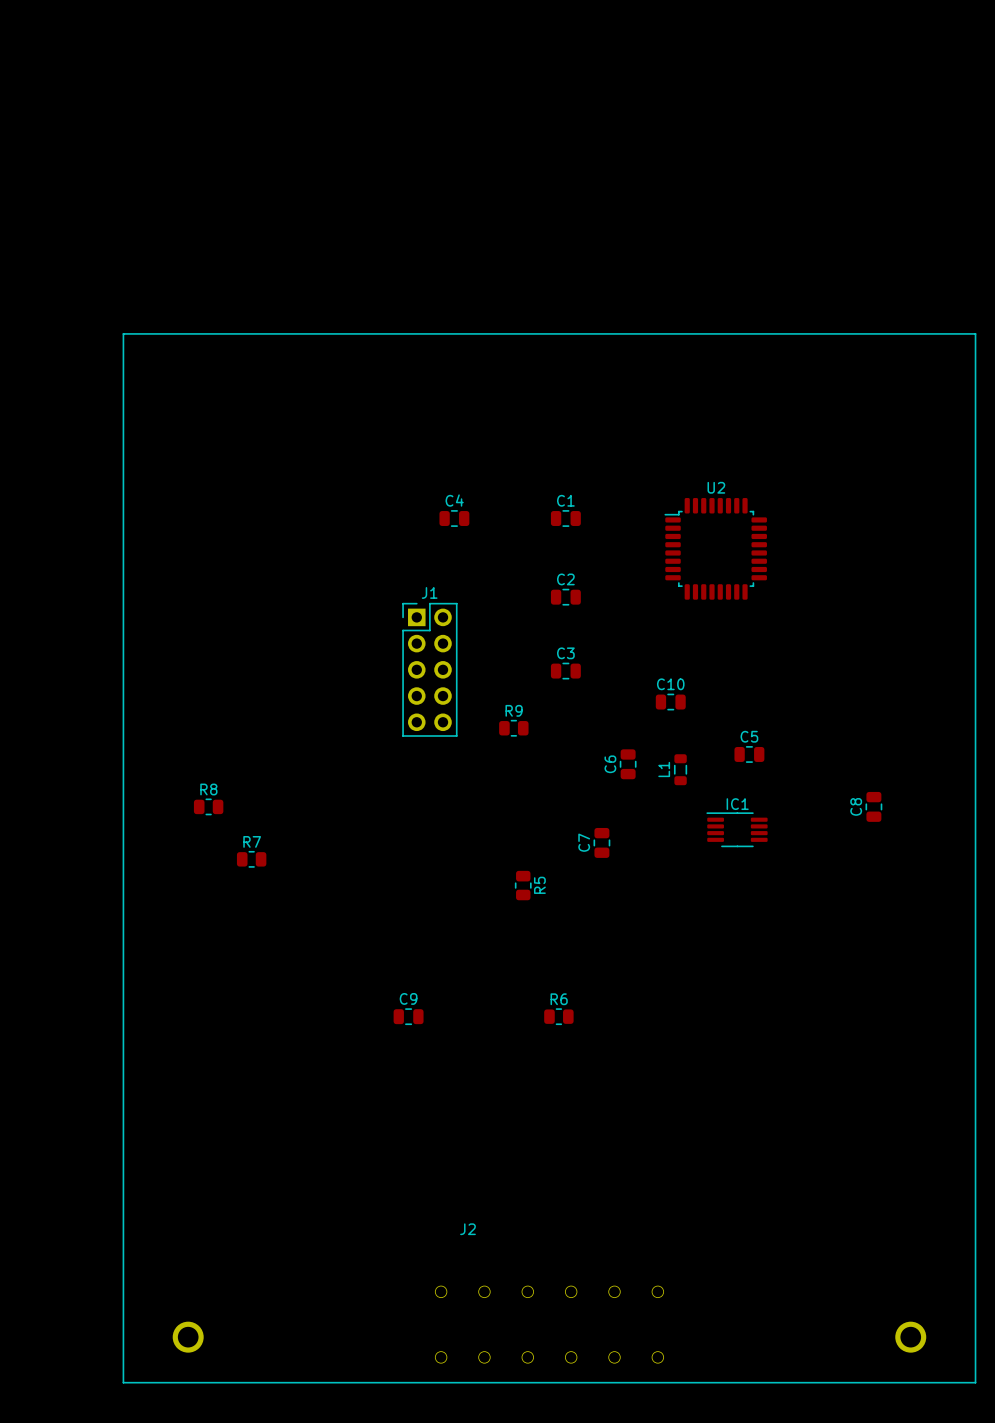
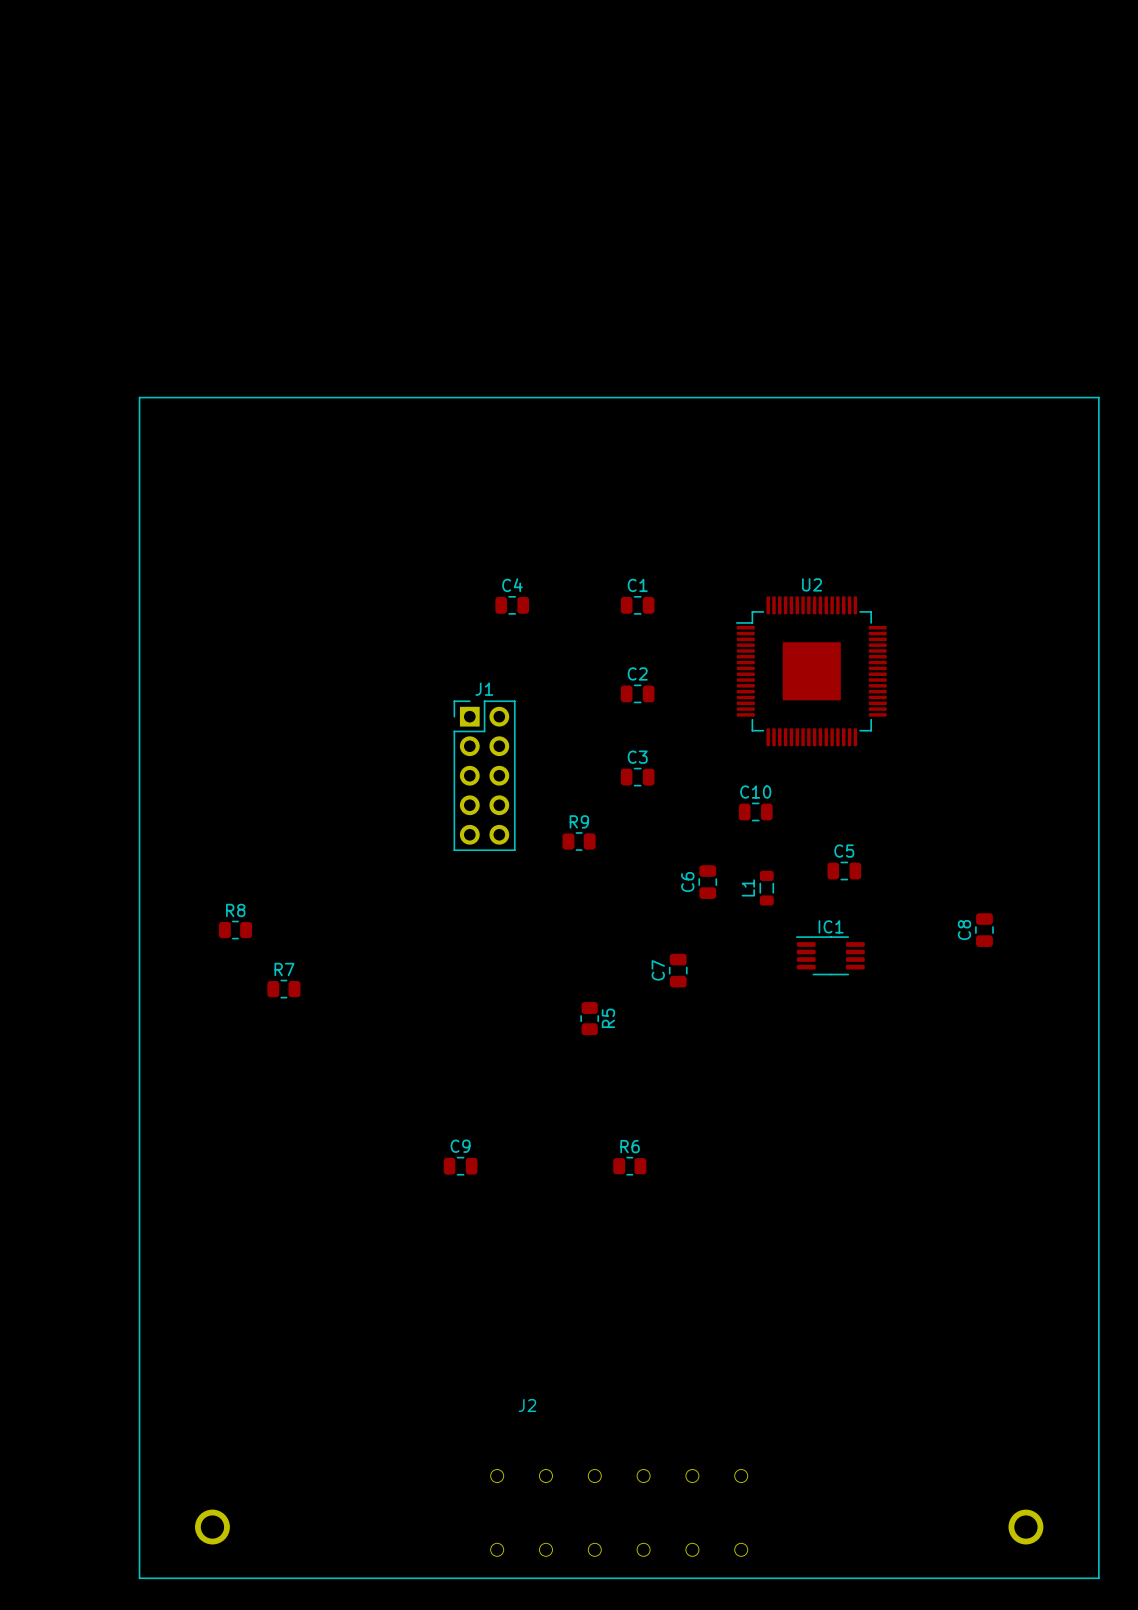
U2 footprint: [664, 498, 767, 600] -> [736, 596, 887, 747]

